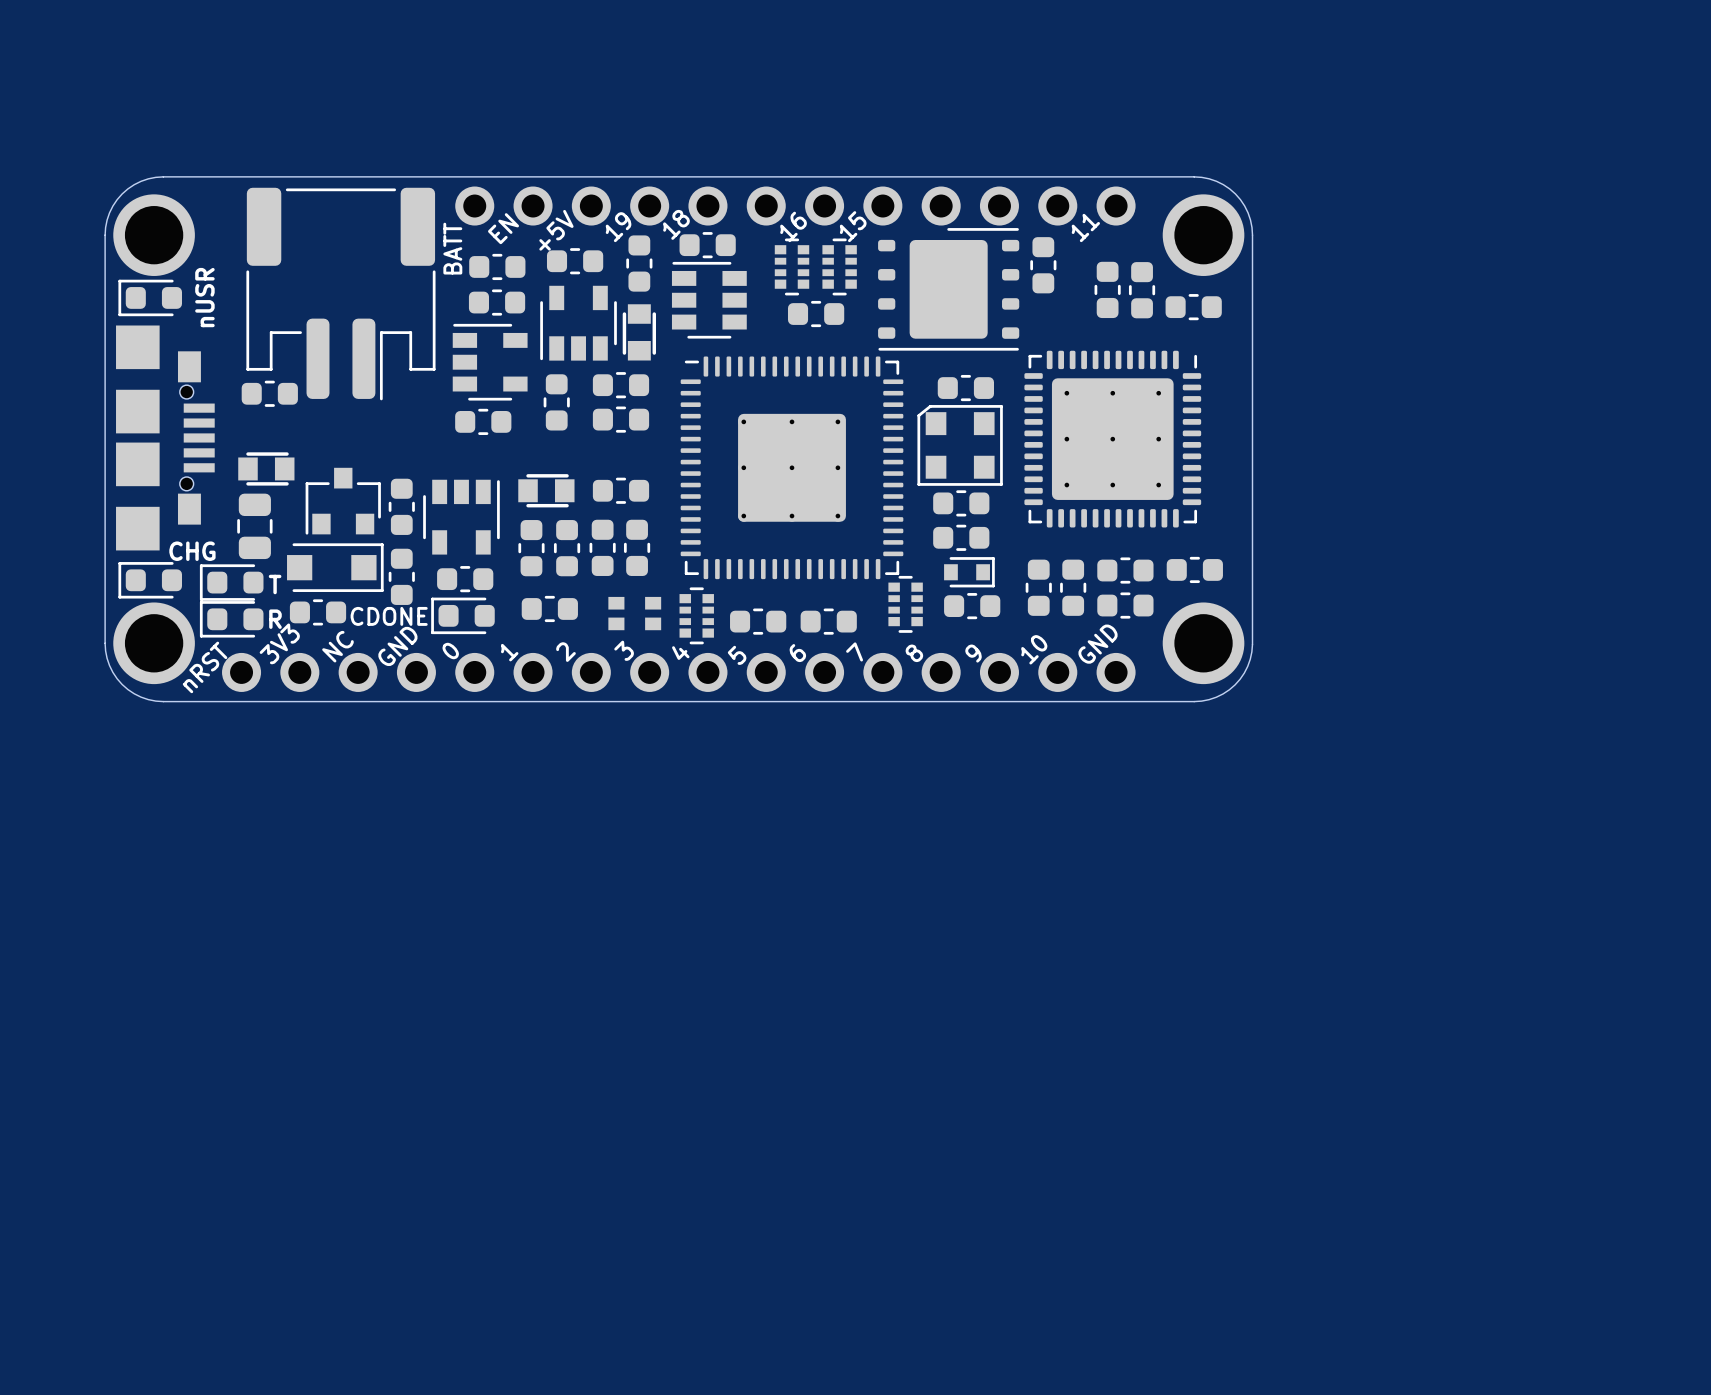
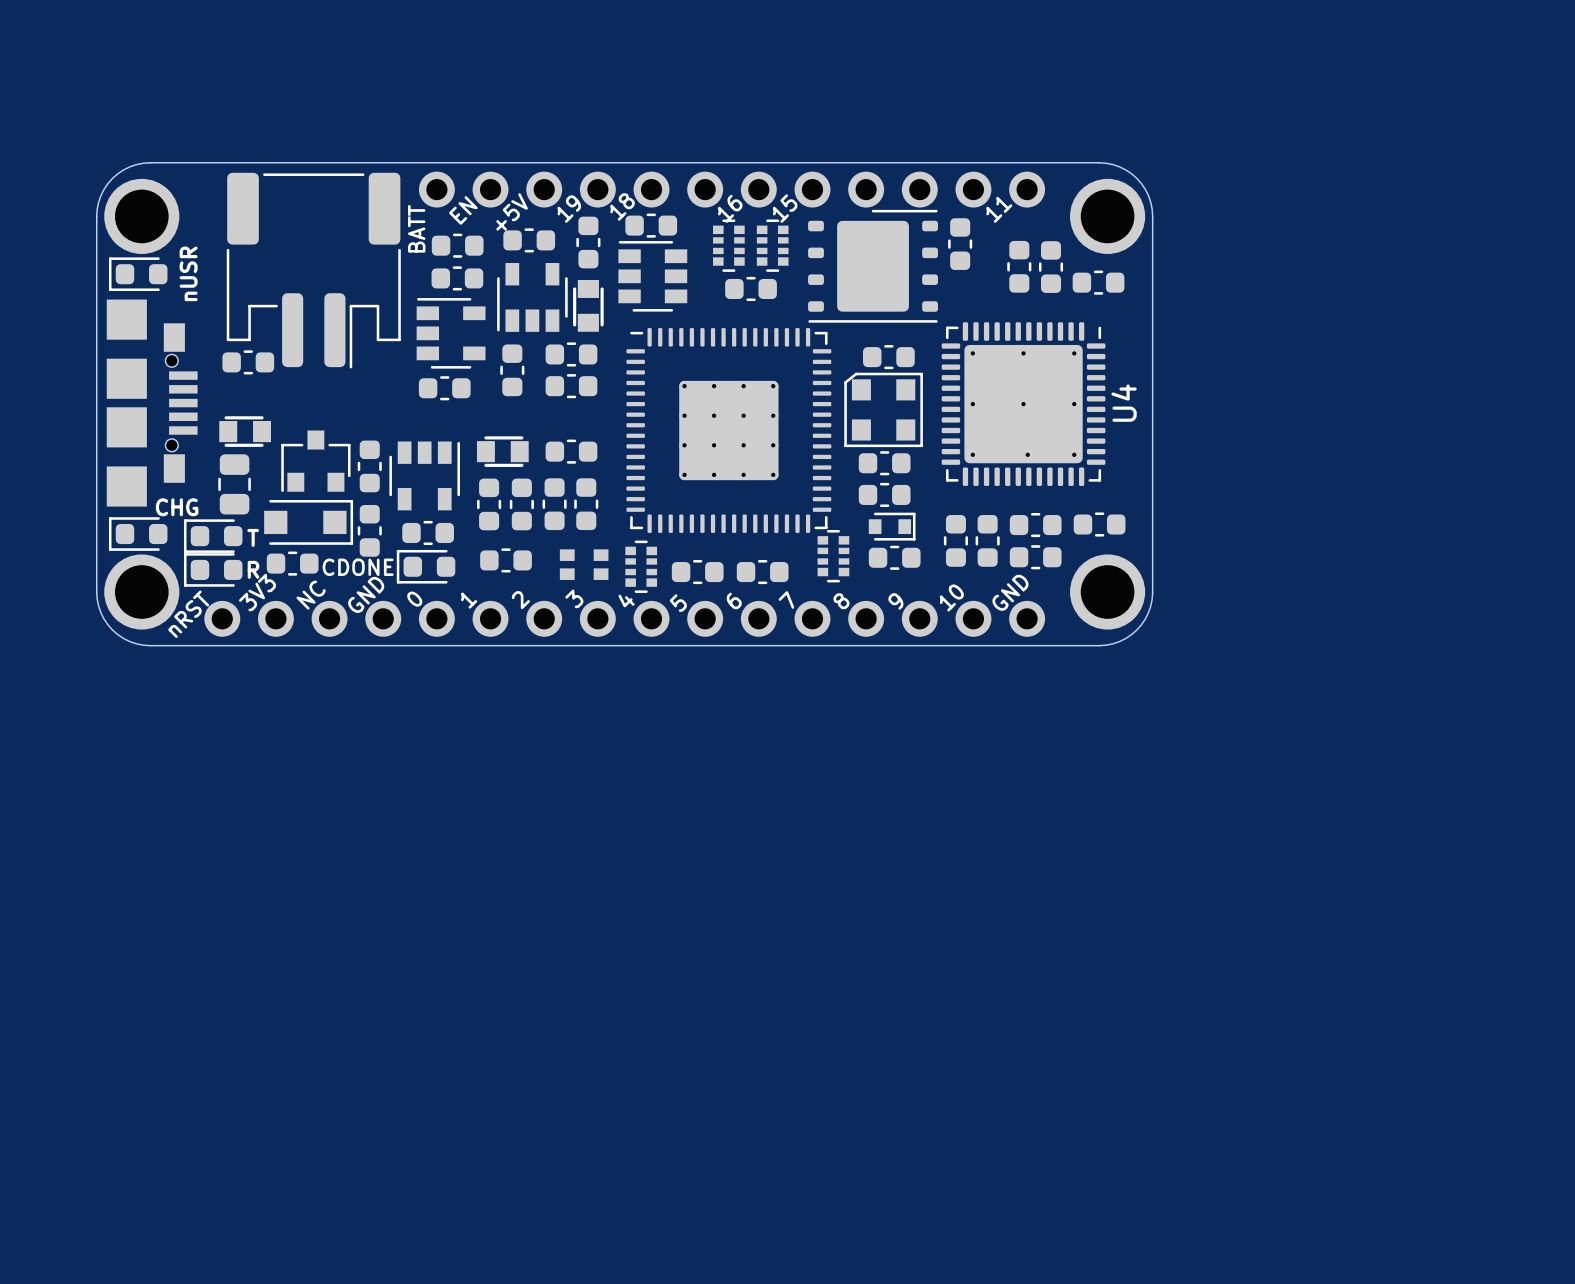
part footprint: [680, 356, 904, 580] -> [626, 328, 832, 533]
part: (1112, 439) -> none
U4: none -> (1023, 404)
part rotation: 0° (266, 468) -> 180° (245, 431)

